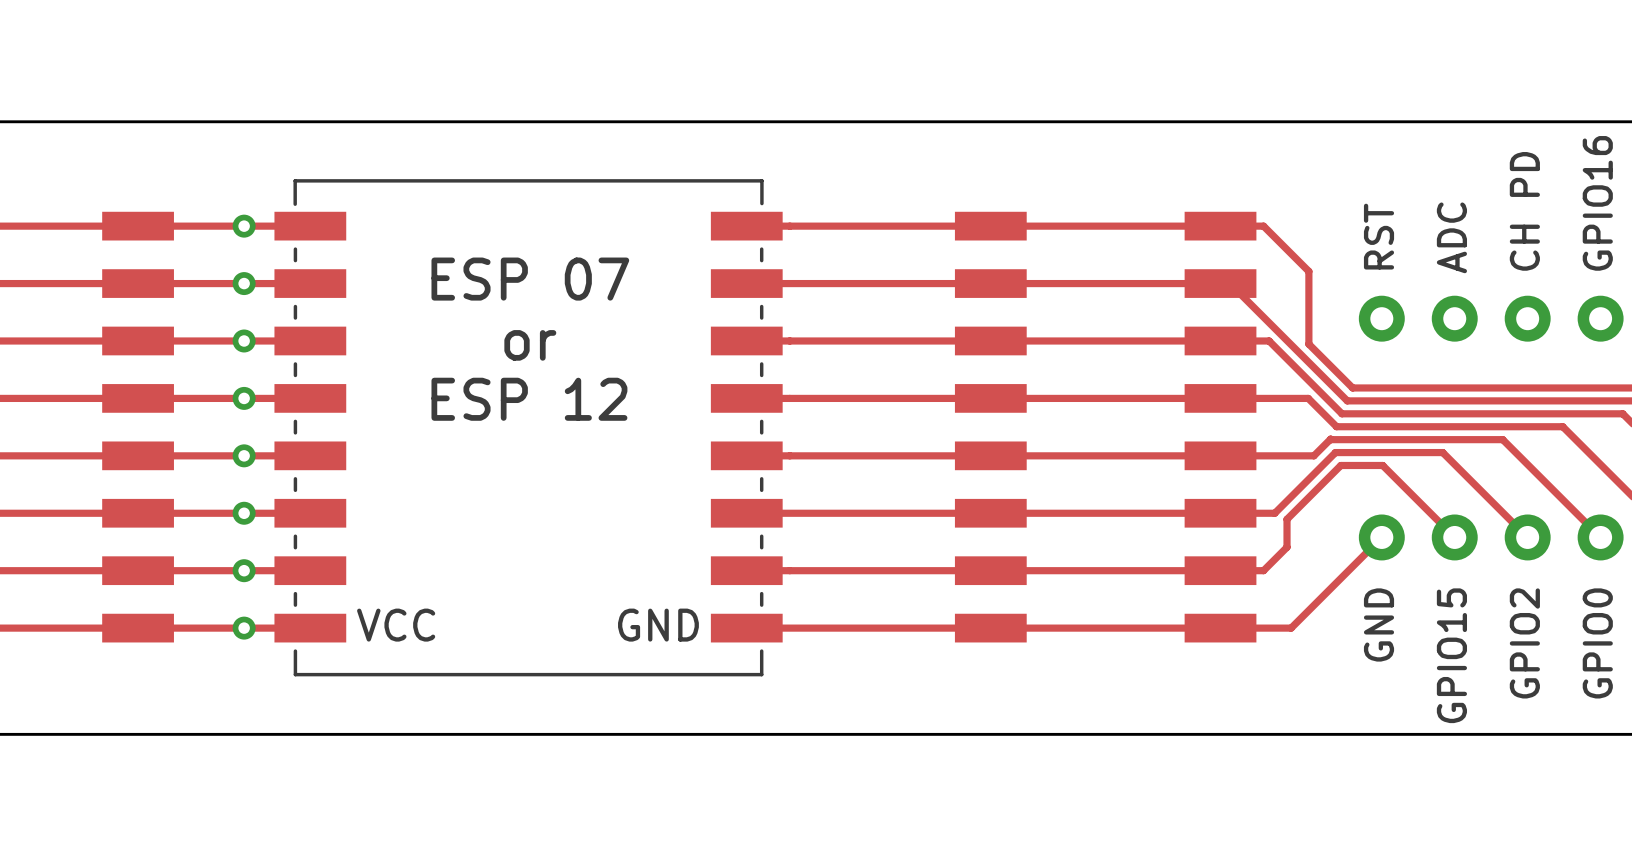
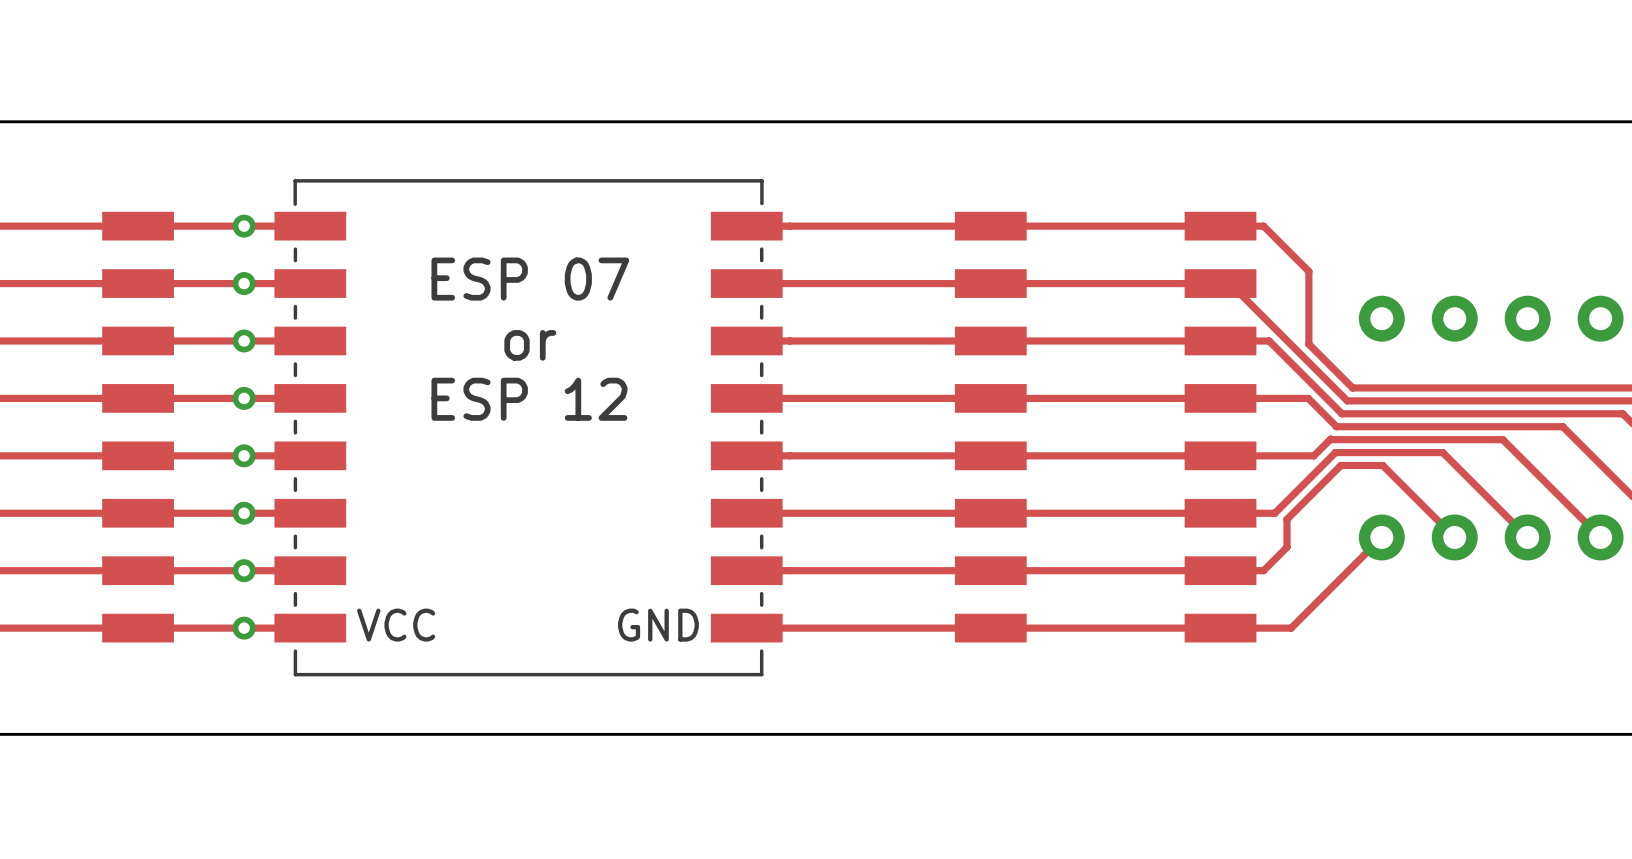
text: GPIO16 (1597, 203) -> none
text: CH PD (1524, 211) -> none
text: RST (1379, 236) -> none
text: ADC (1451, 237) -> none
text: GND (1379, 624) -> none
text: GPIO2 (1524, 643) -> none
text: GPIO0 (1597, 643) -> none
text: GPIO15 (1451, 655) -> none

